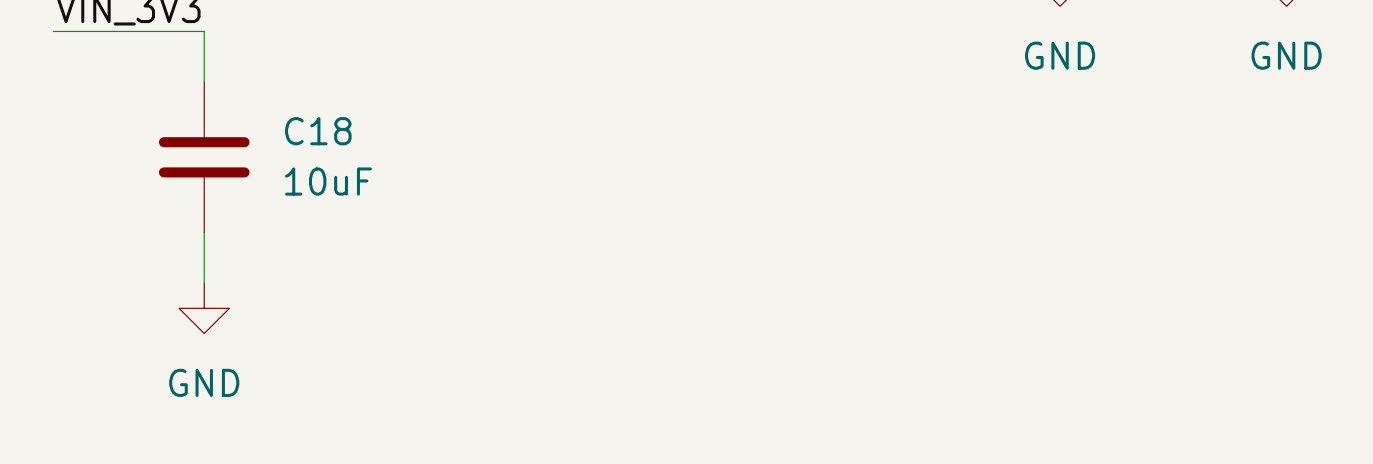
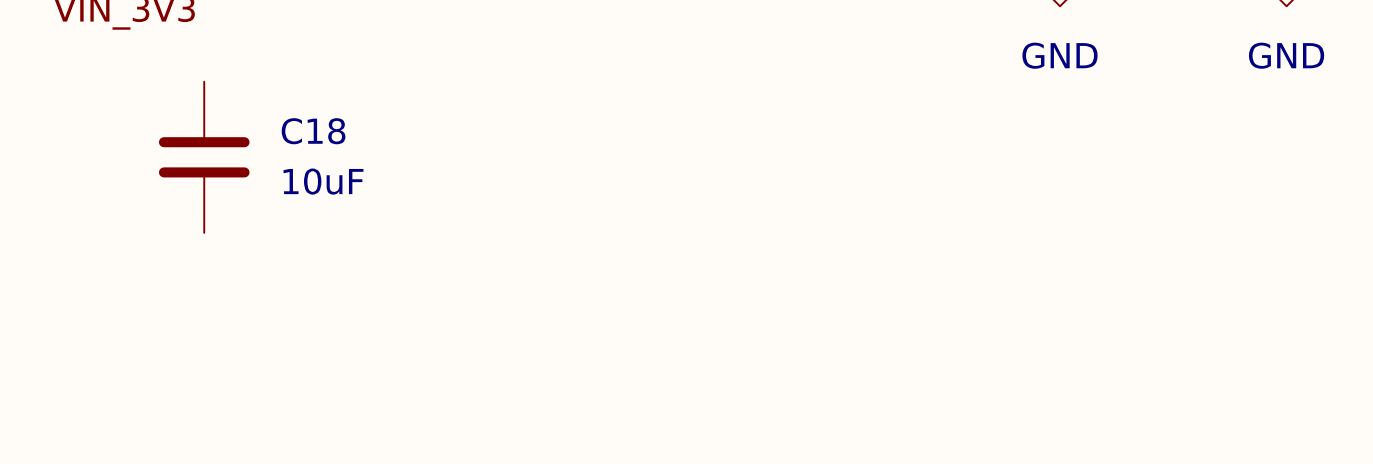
wire: (53, 31) (204, 31) (204, 81) -> none
wire: (204, 232) (204, 283) -> none
power symbol: GND (204, 308) -> none

